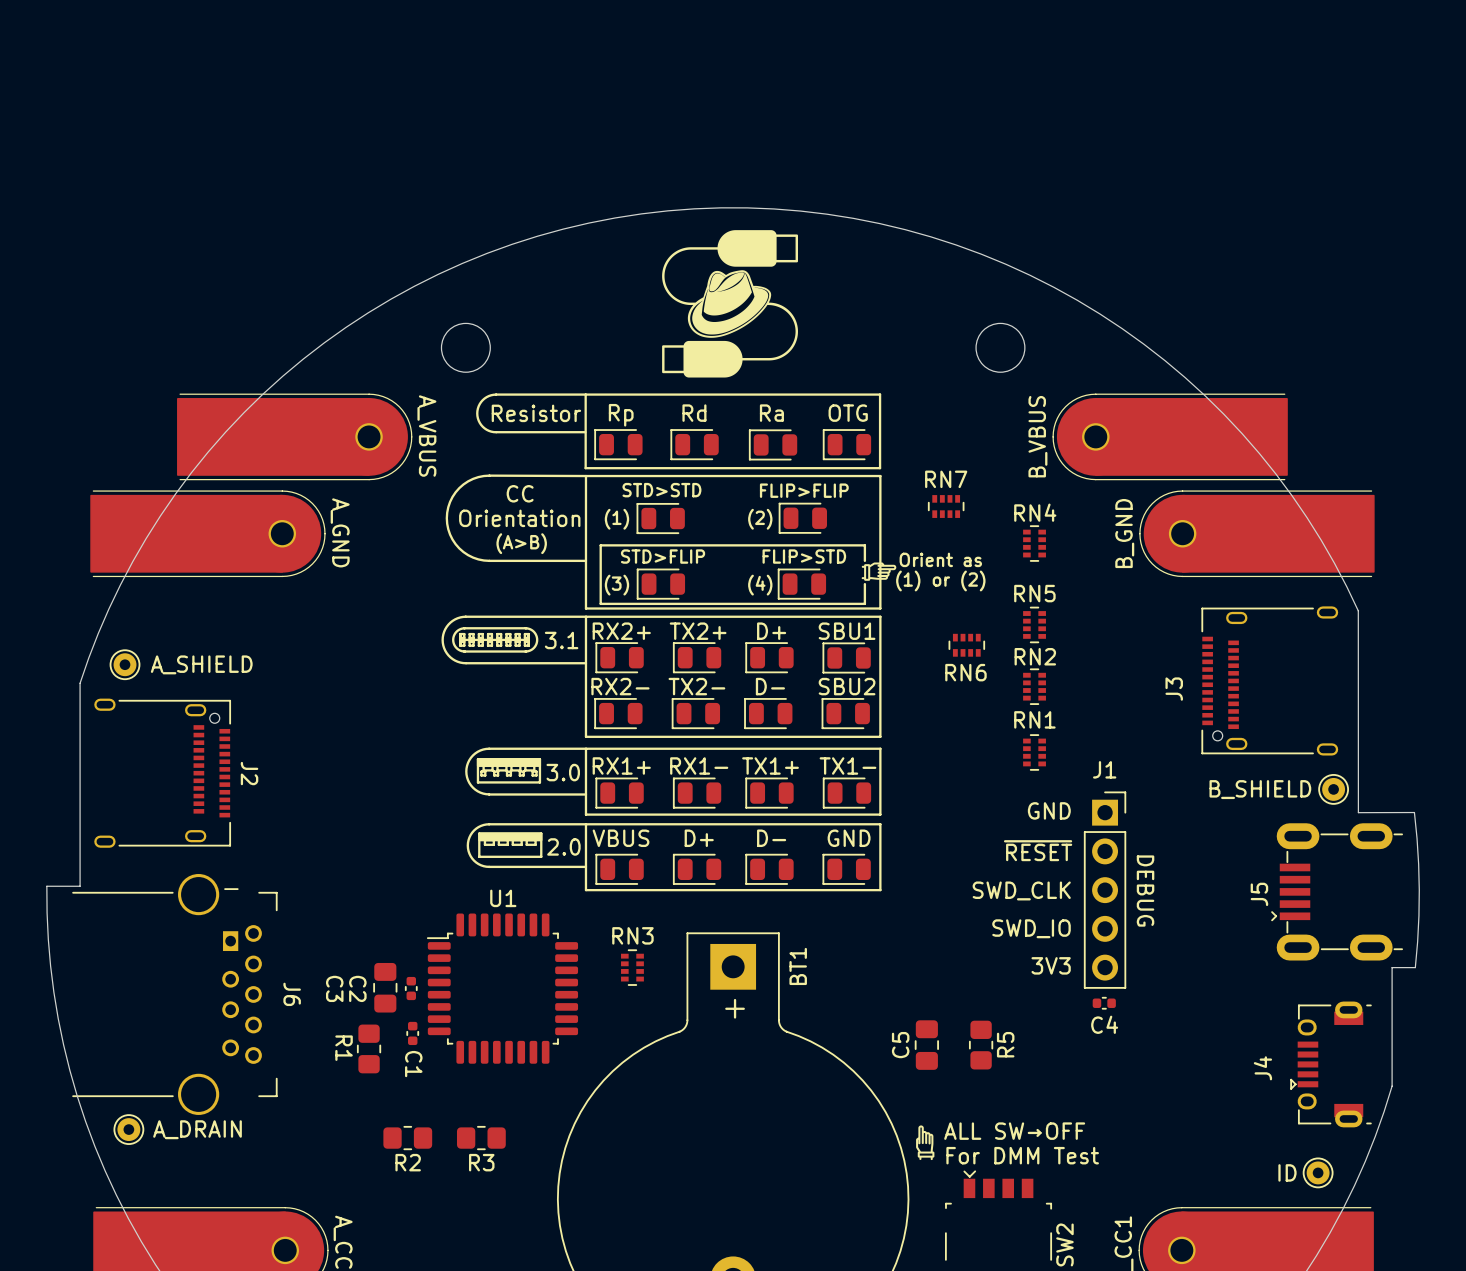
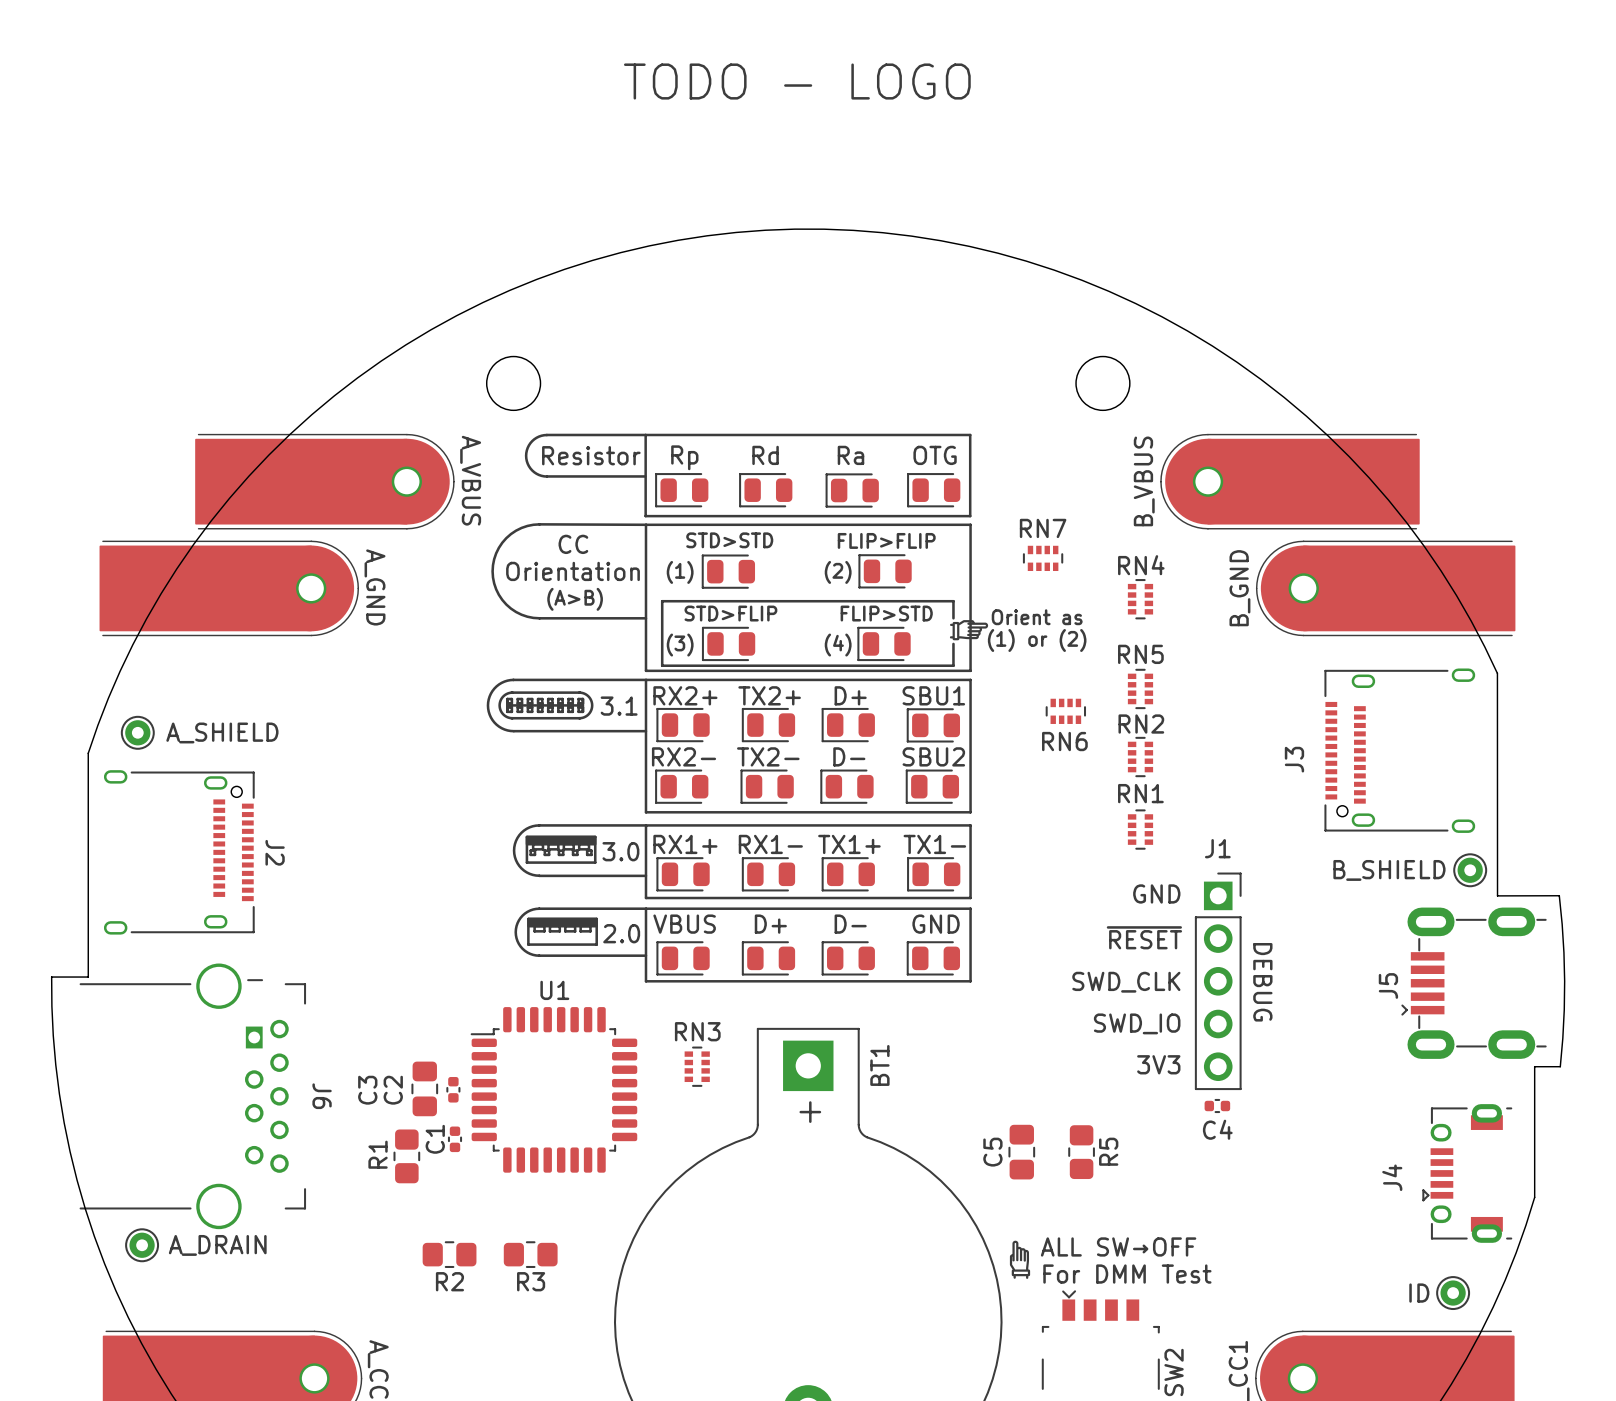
text: none -> TODO - LOGO (797, 81)
drawing: [662, 230, 798, 378] -> none
C3 name rotation: 0° (334, 988) -> 180° (367, 1090)
C2 name rotation: 0° (357, 988) -> 180° (393, 1090)
R1 name rotation: 0° (344, 1048) -> 180° (378, 1154)
C1 name rotation: 0° (413, 1064) -> 180° (435, 1139)

